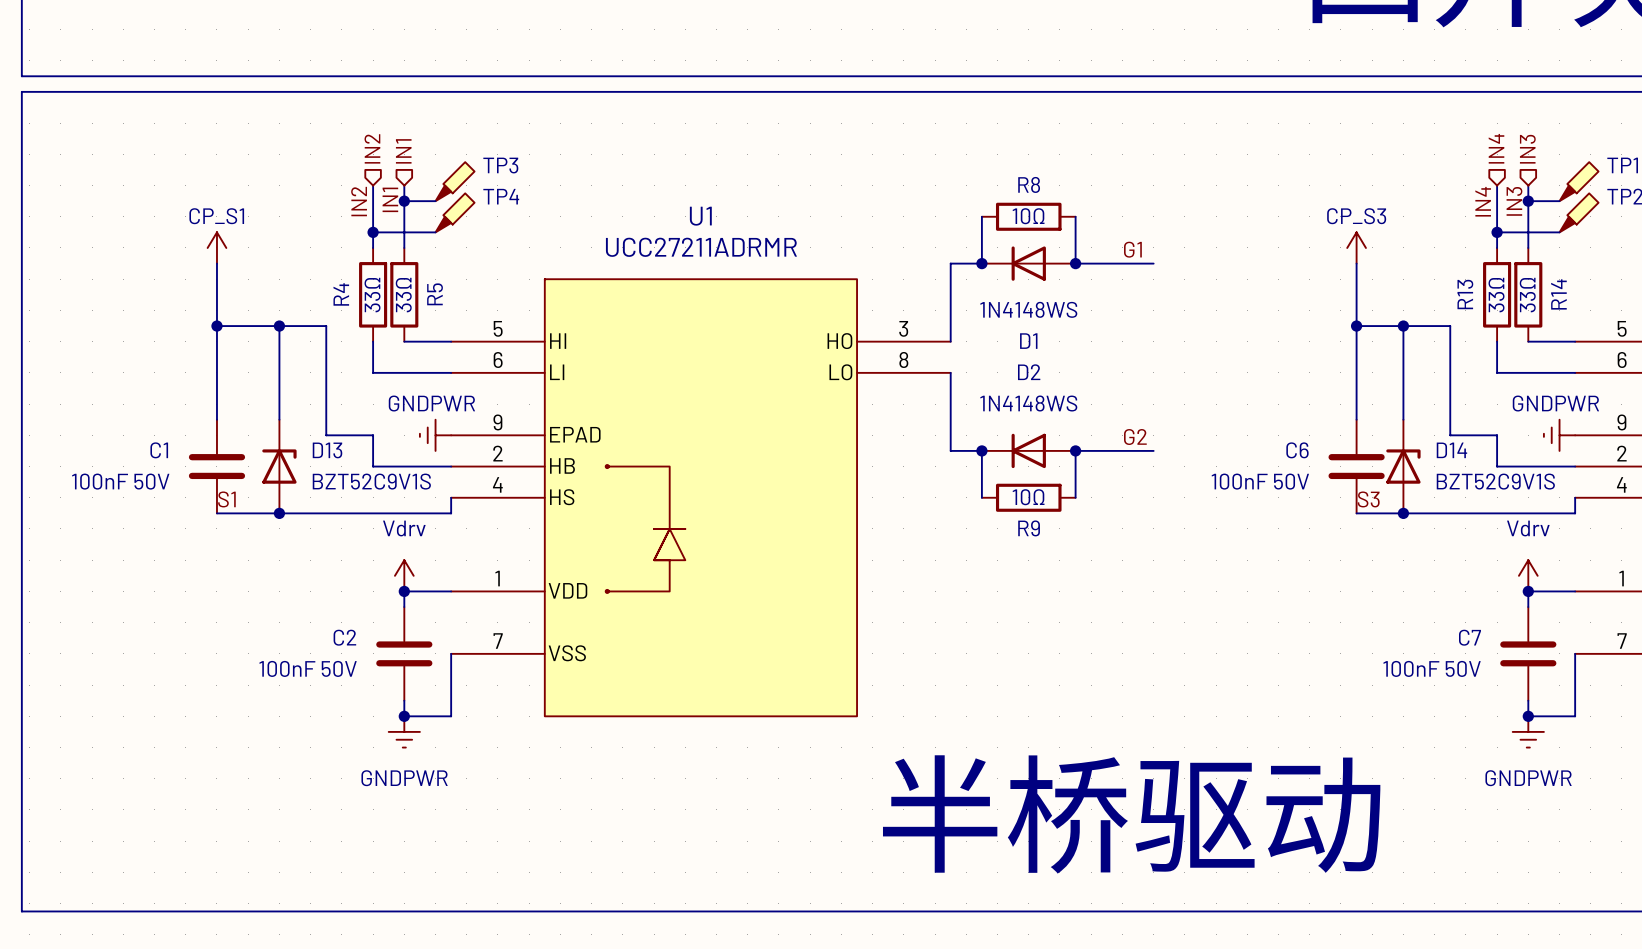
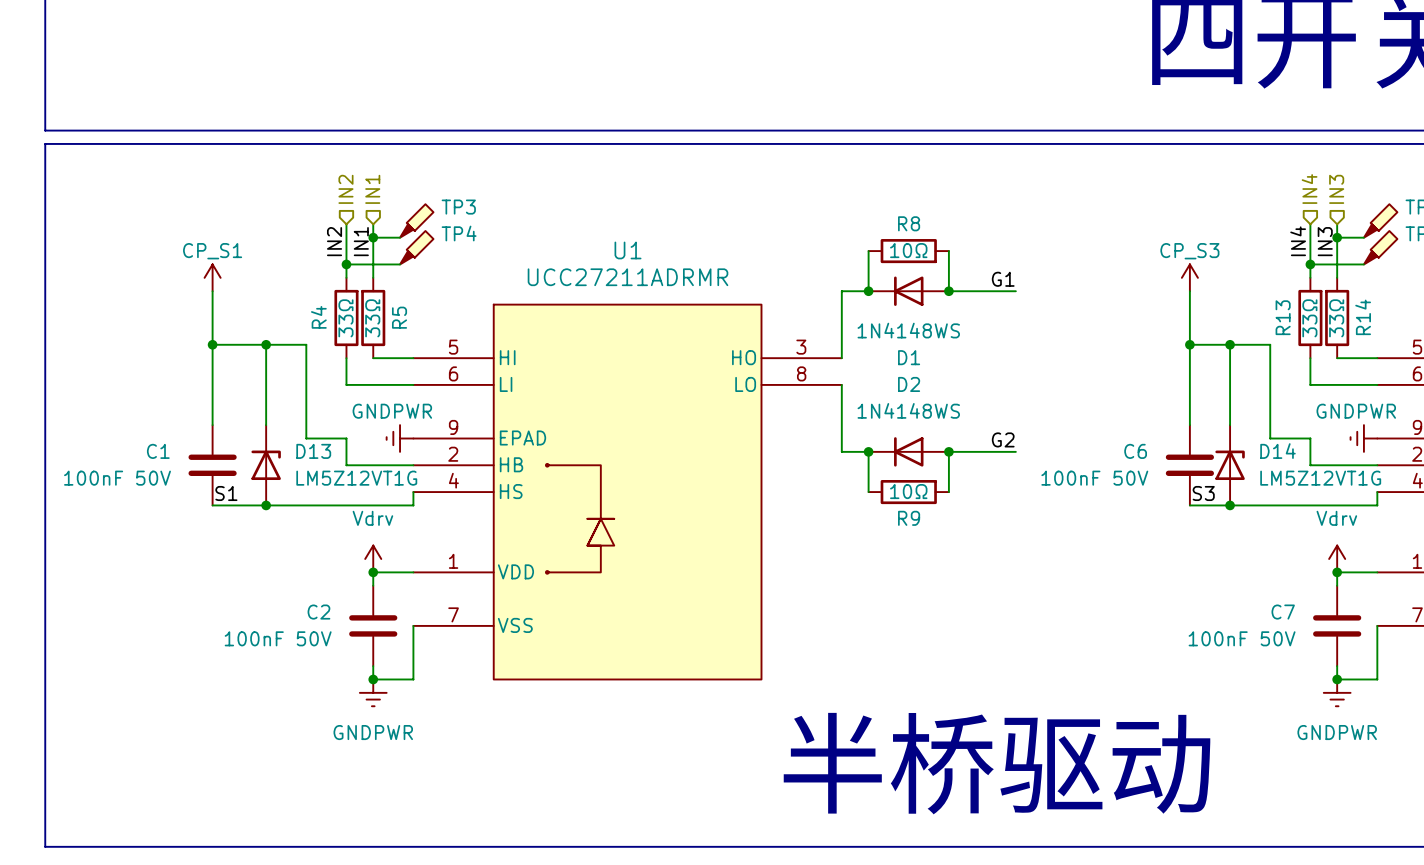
D13 value: BZT52C9V1S (371, 481) -> LM5Z12VT1G (356, 478)
D14 value: BZT52C9V1S (1495, 481) -> LM5Z12VT1G (1320, 478)

